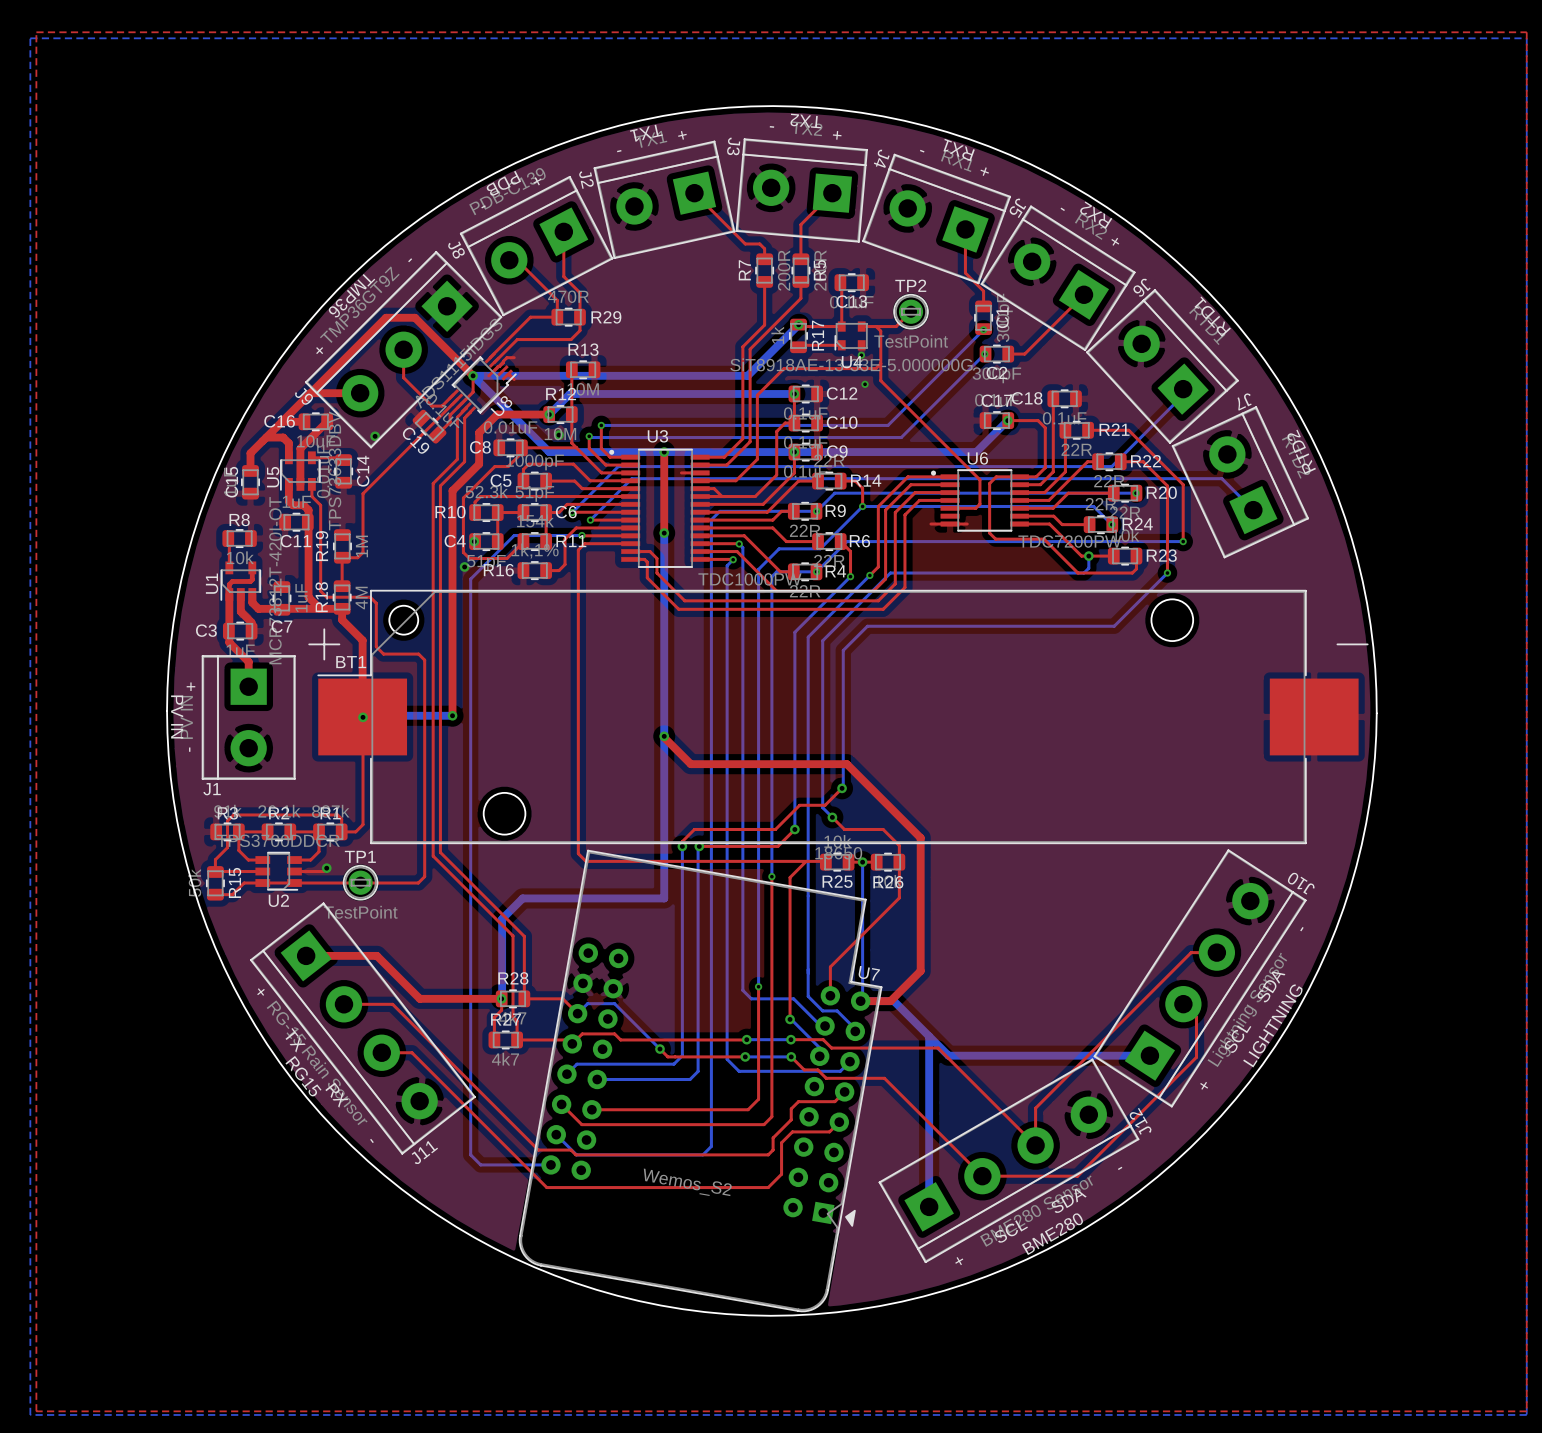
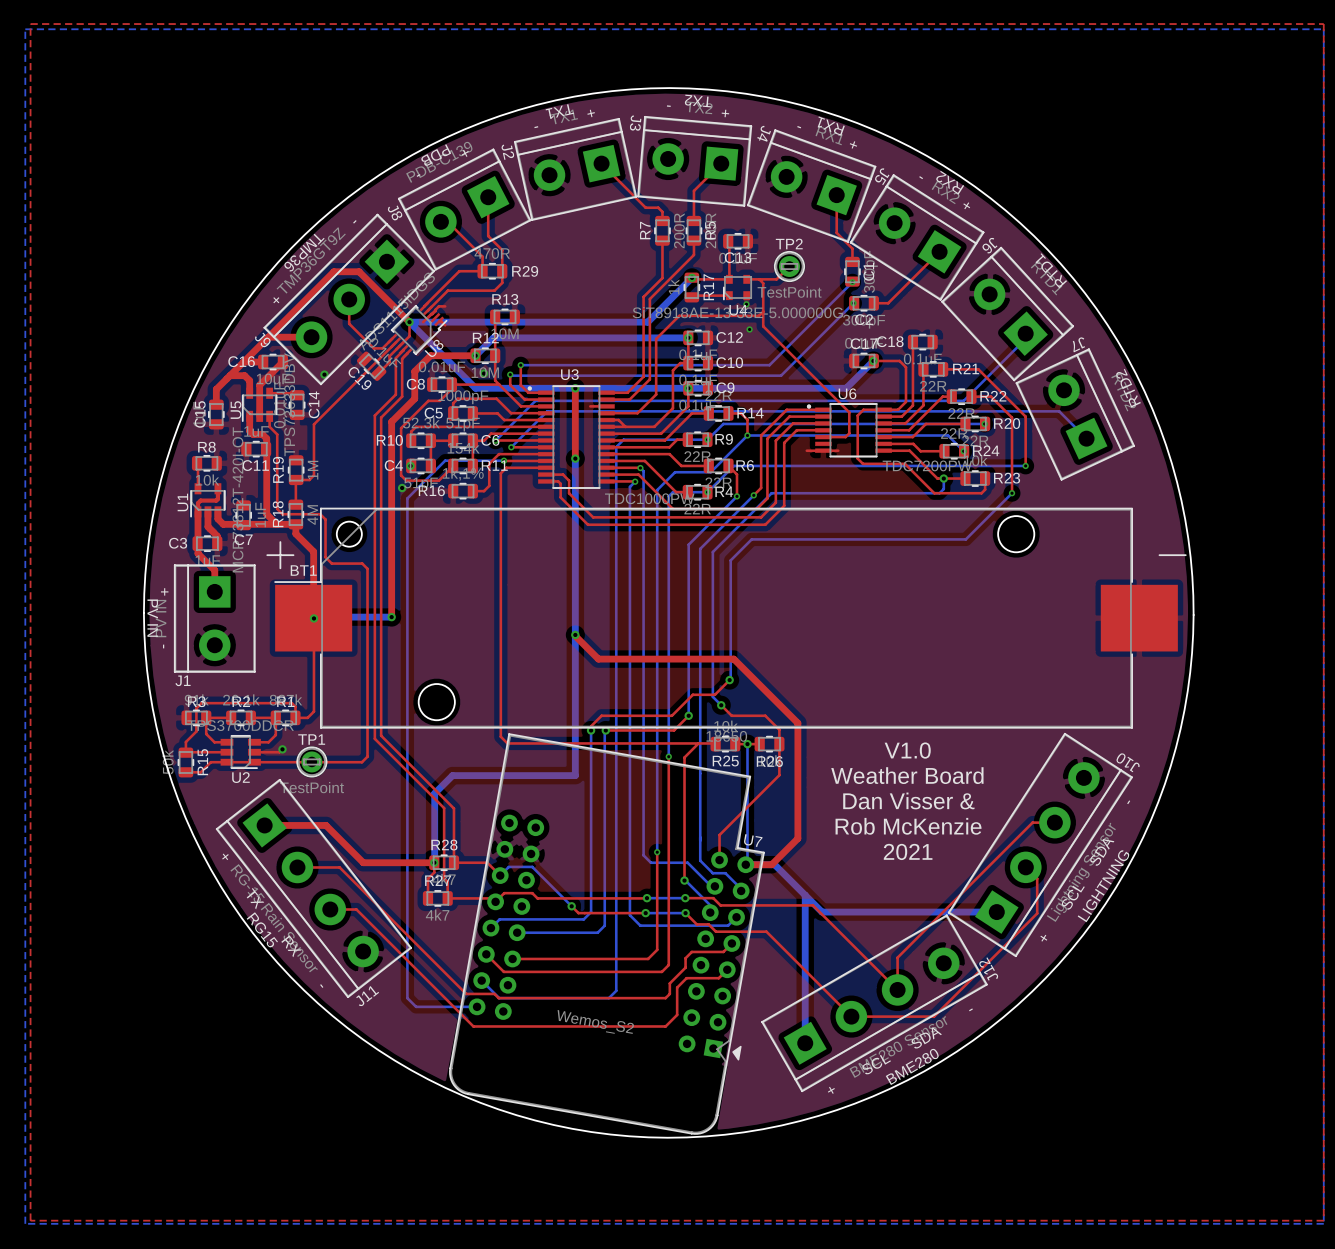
text: none -> V1.0 (907, 750)
text: none -> Weather Board (907, 775)
text: none -> Dan Visser & (908, 800)
text: none -> Rob McKenzie (908, 826)
text: none -> 2021 (908, 851)

